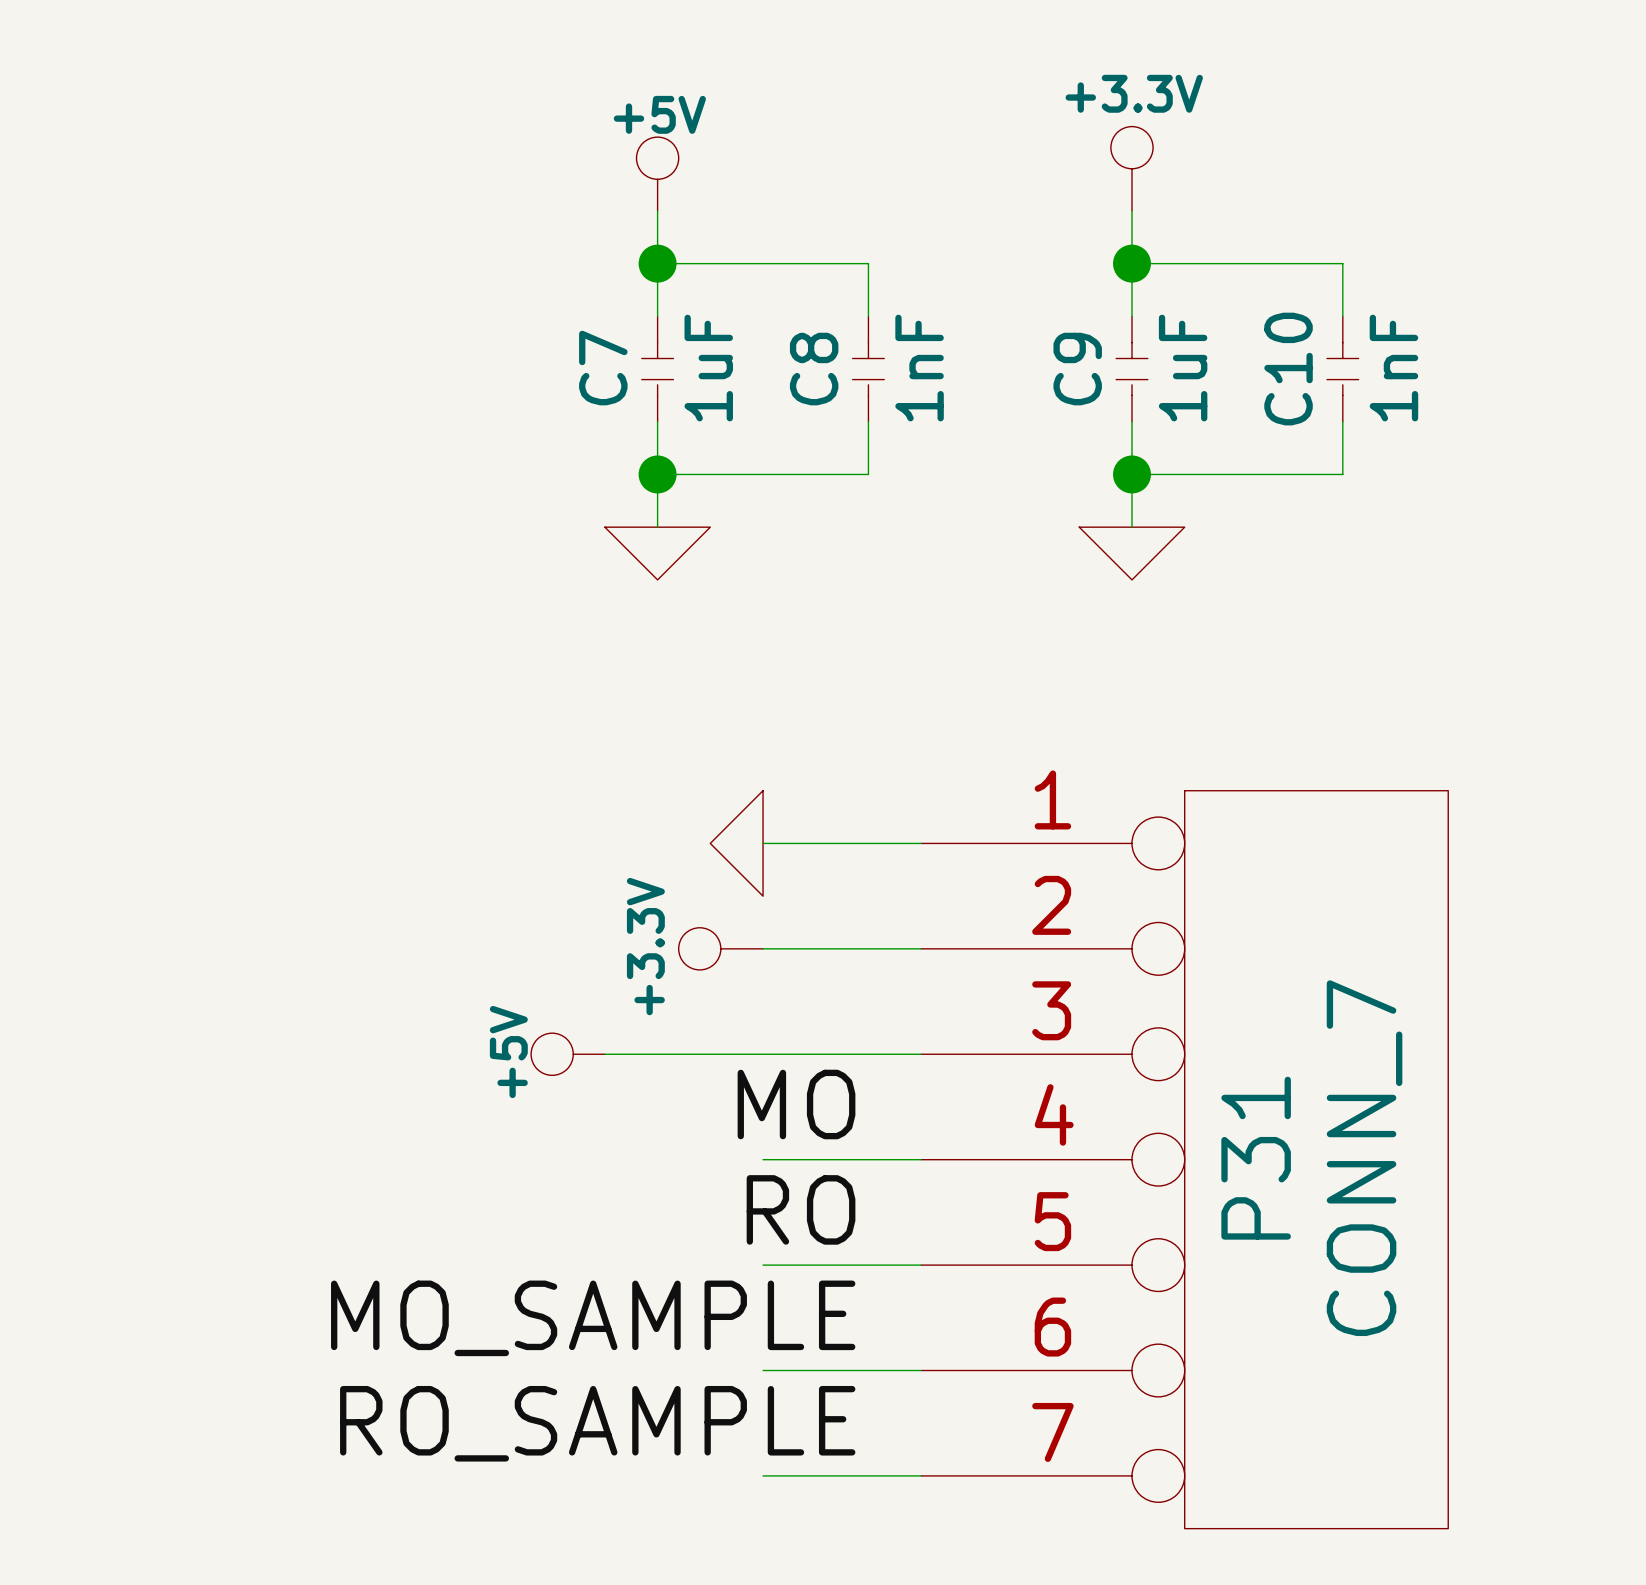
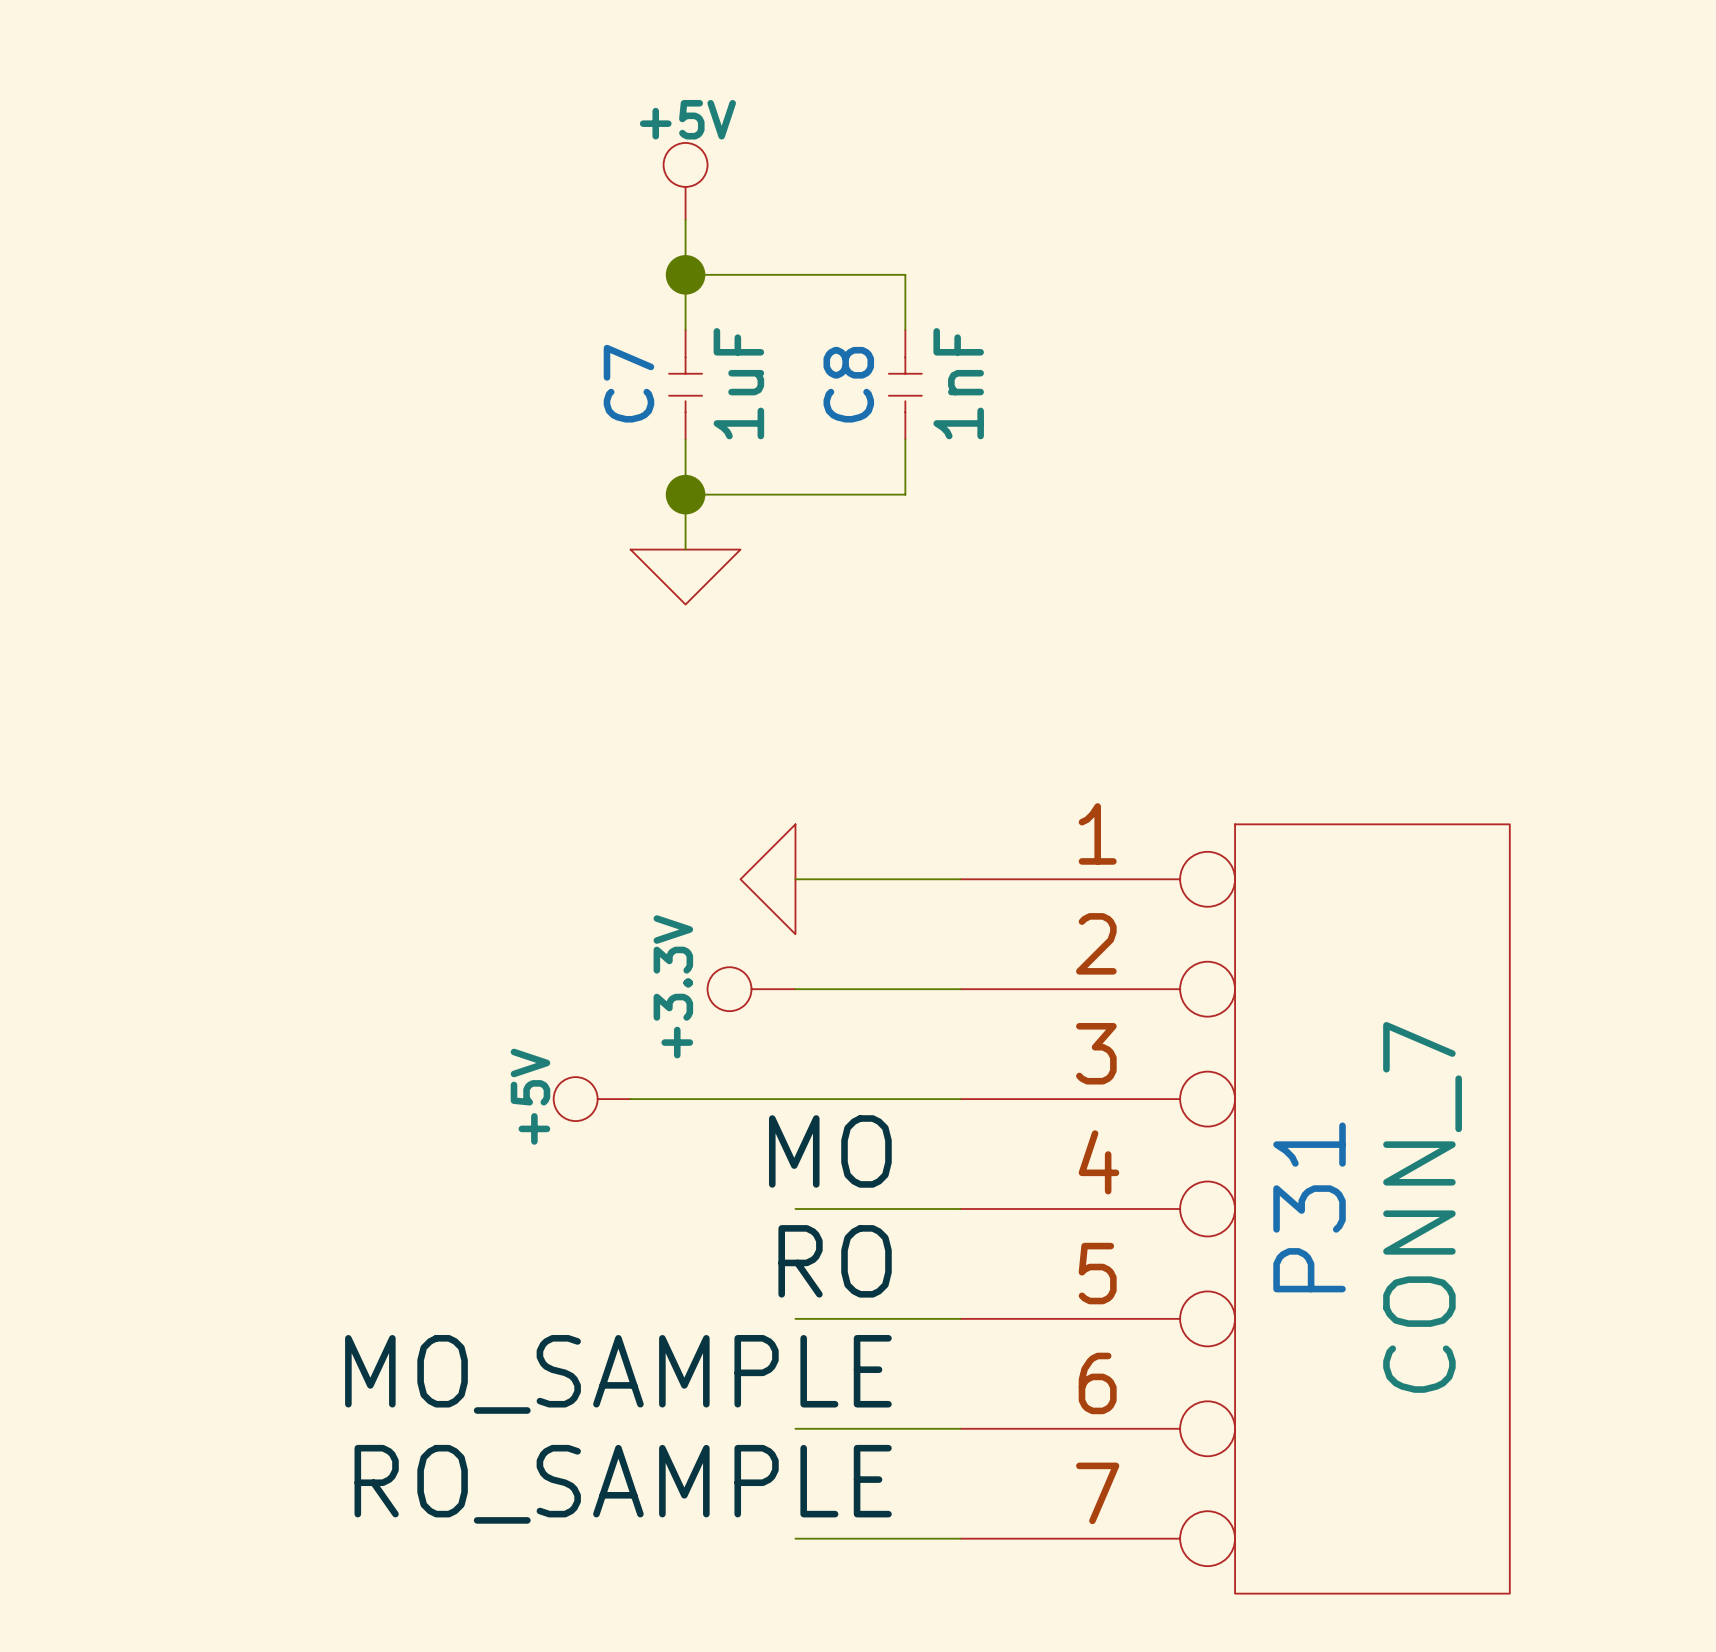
power symbol: +3.3V (1131, 168) -> none
wire: (1131, 210) (1131, 316) -> none
wire: (1131, 263) (1342, 263) (1342, 316) -> none
junction: (1131, 263) -> none
C9: 1uF (1131, 369) -> none
C10: 1nF (1342, 369) -> none
wire: (1131, 421) (1131, 527) -> none
wire: (1342, 421) (1342, 474) (1131, 474) -> none
junction: (1131, 474) -> none
power symbol: (1131, 553) -> none

